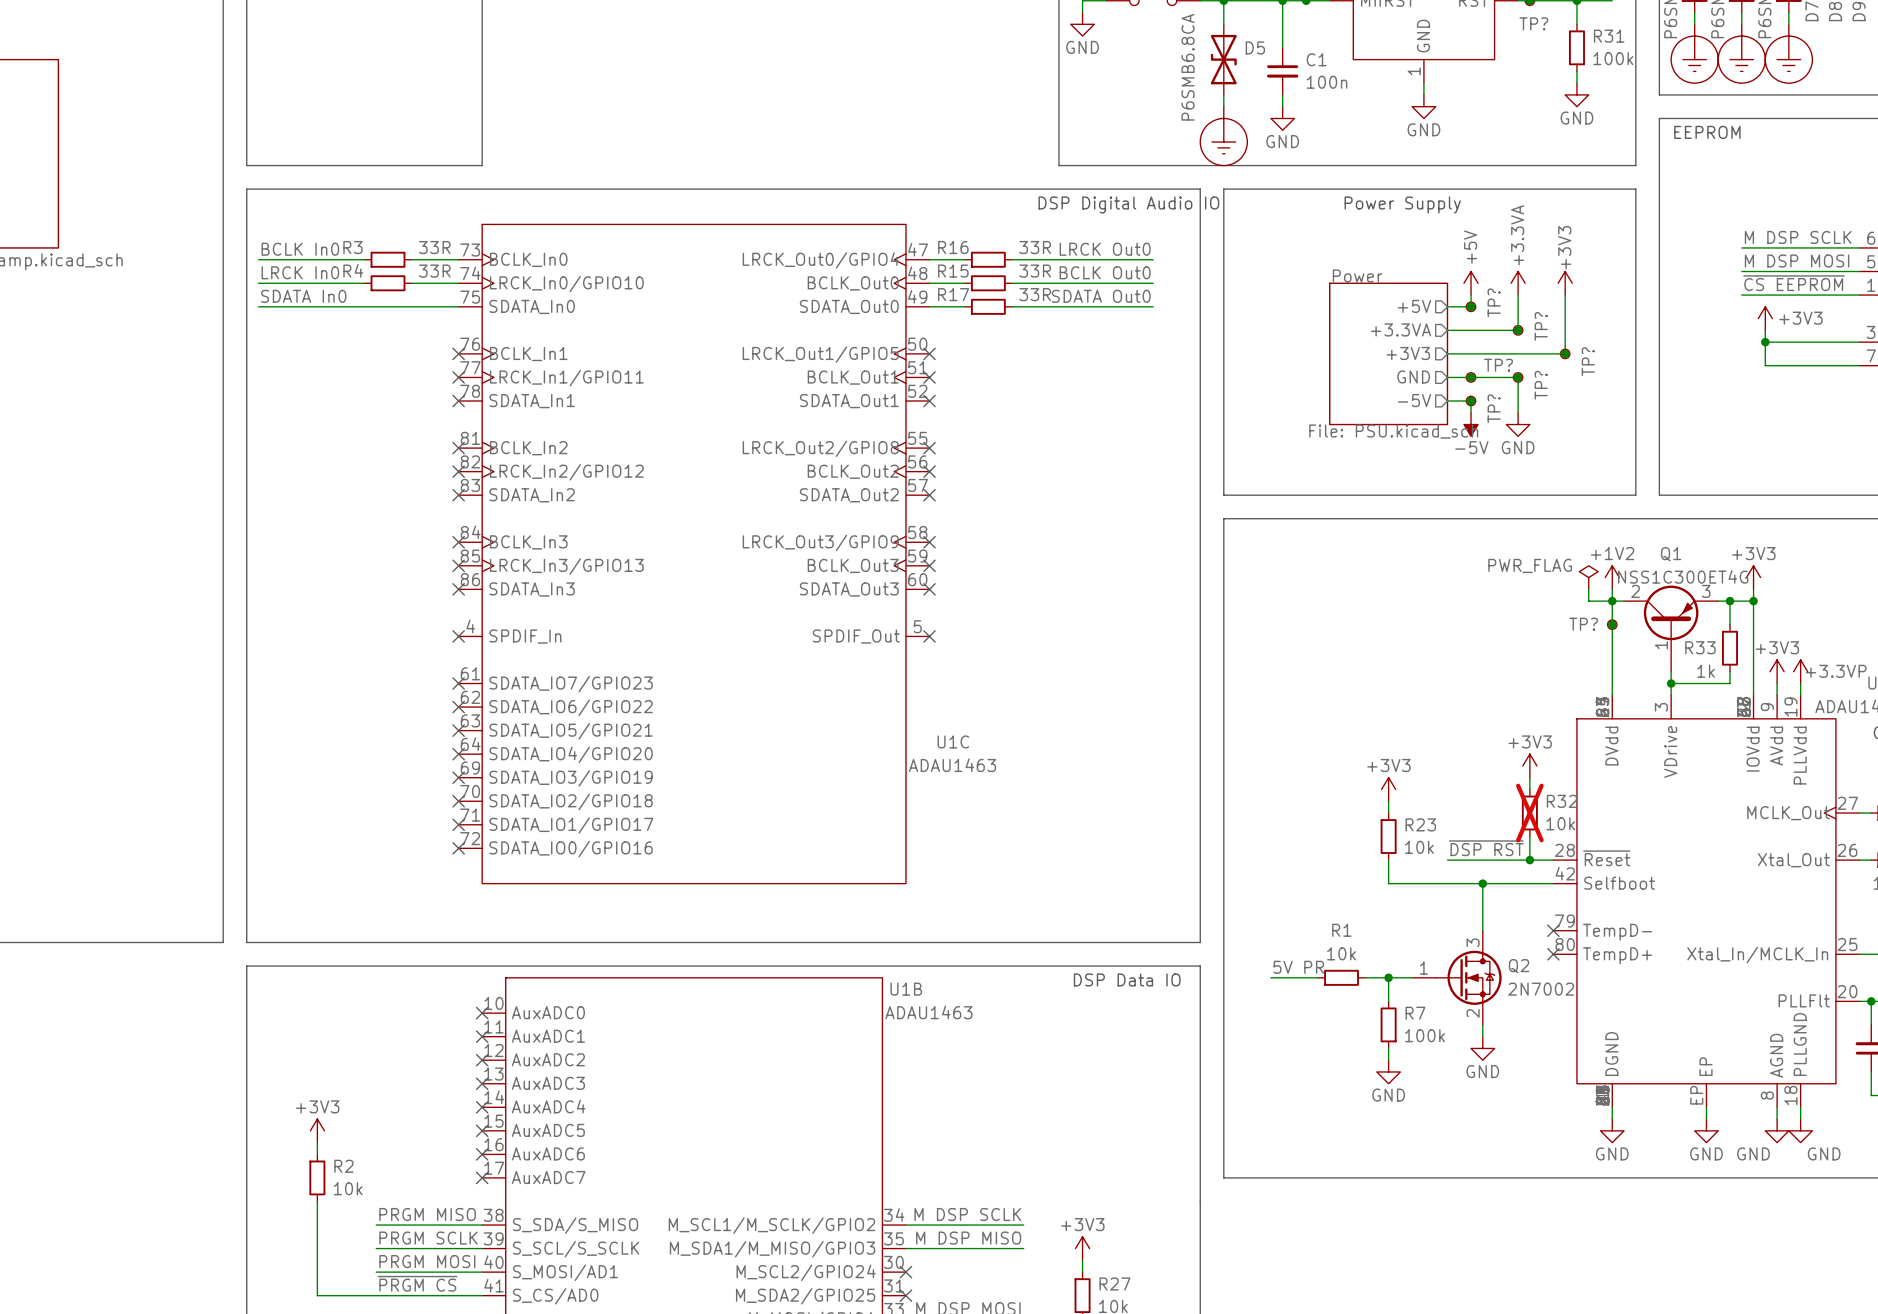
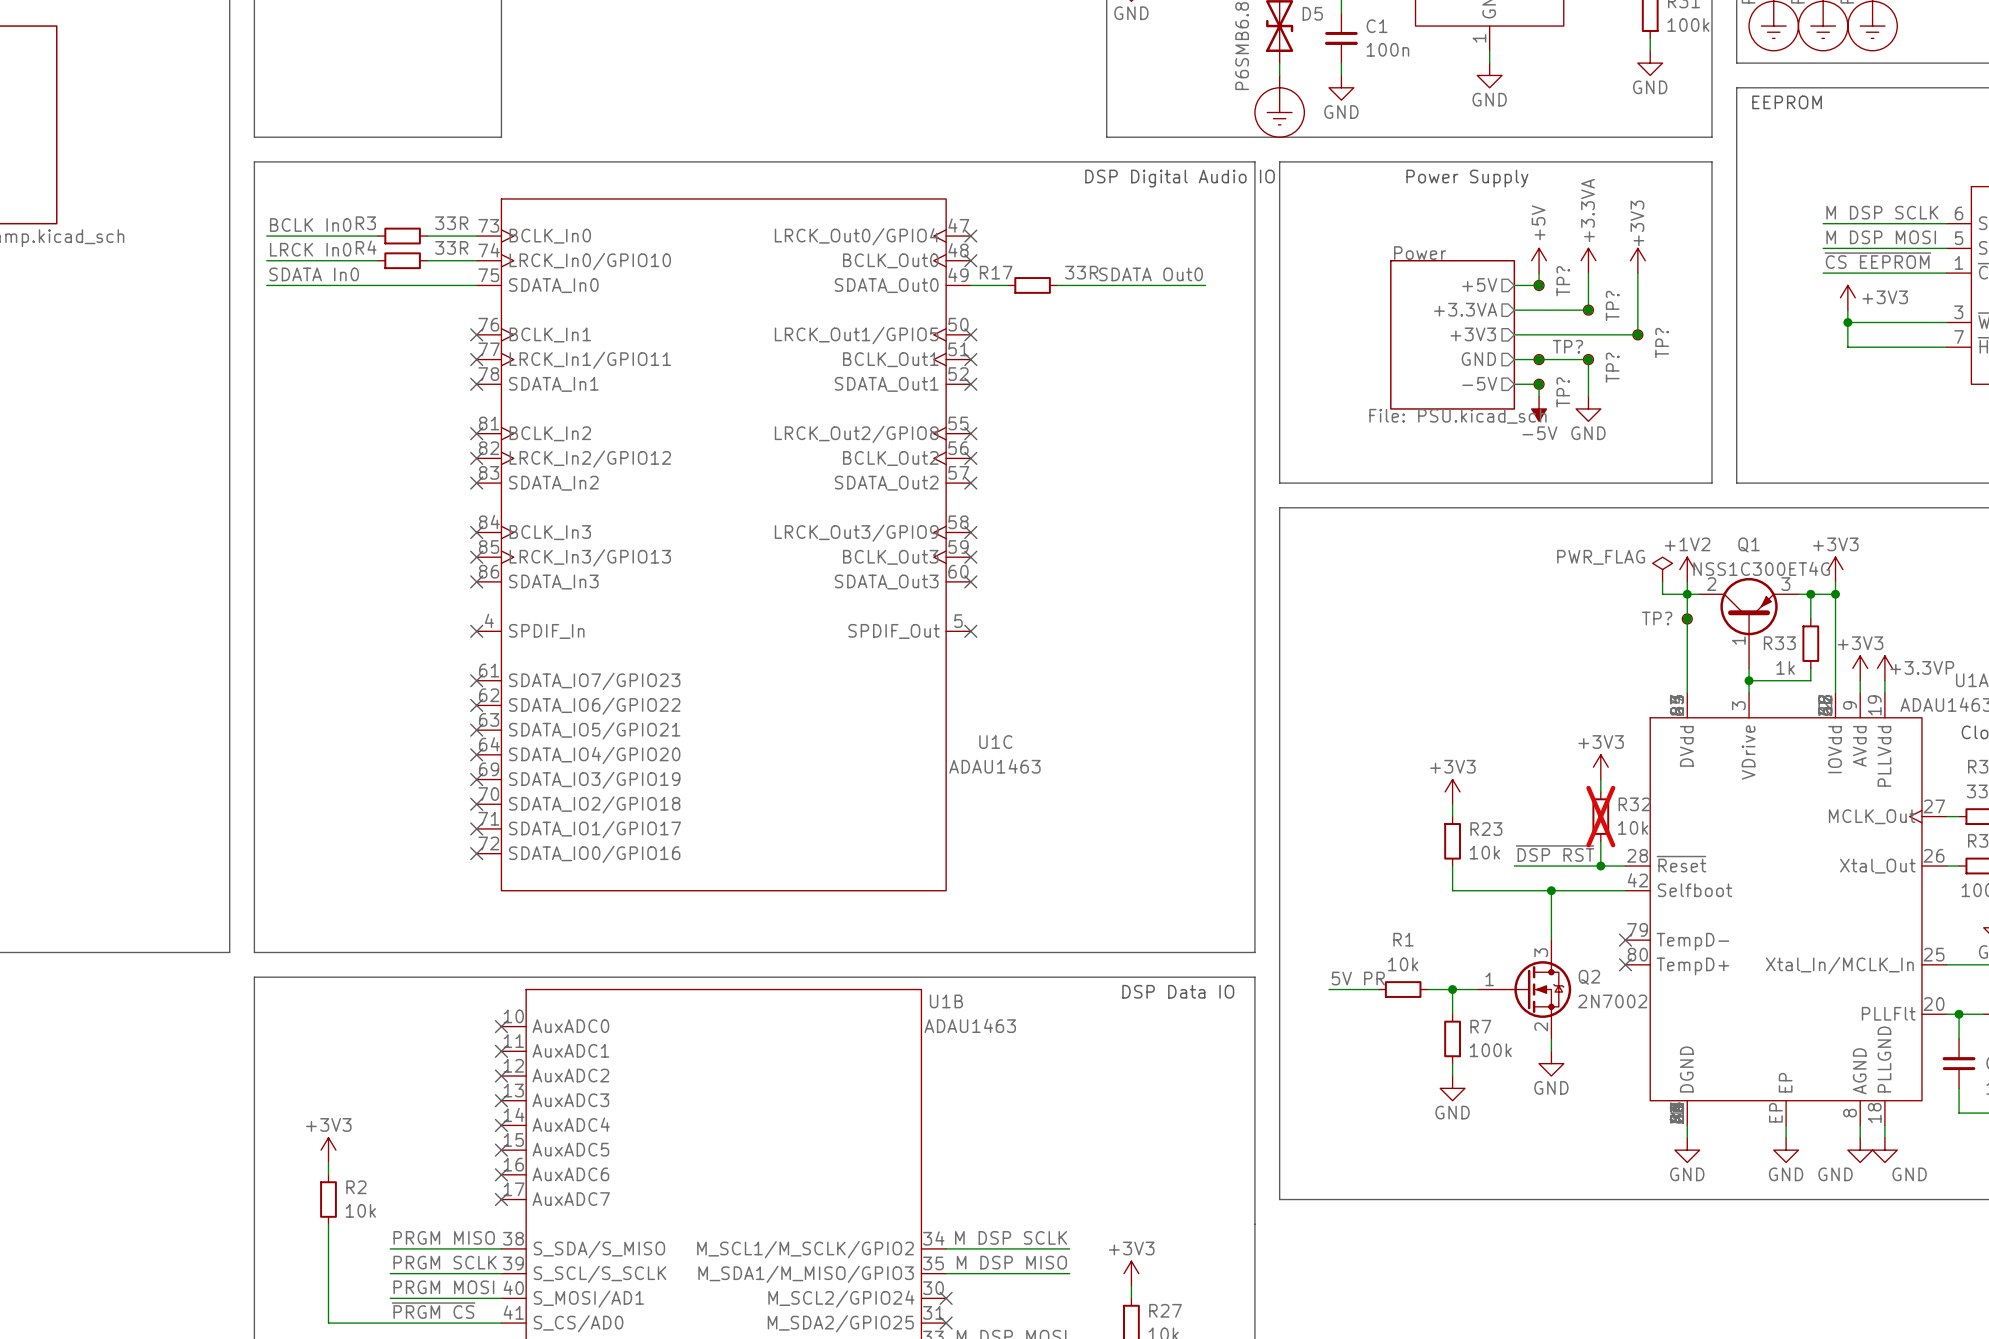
label: LRCK Out0 (1105, 249) -> none
wire: (929, 259) (964, 259) -> none
no-connect mark: none -> (970, 236)
R16: 33R (988, 259) -> none
wire: (1011, 259) (1153, 259) -> none
label: BCLK Out0 (1105, 272) -> none
wire: (929, 283) (964, 283) -> none
no-connect mark: none -> (970, 260)
R15: 33R (988, 283) -> none
wire: (1011, 283) (1153, 283) -> none

